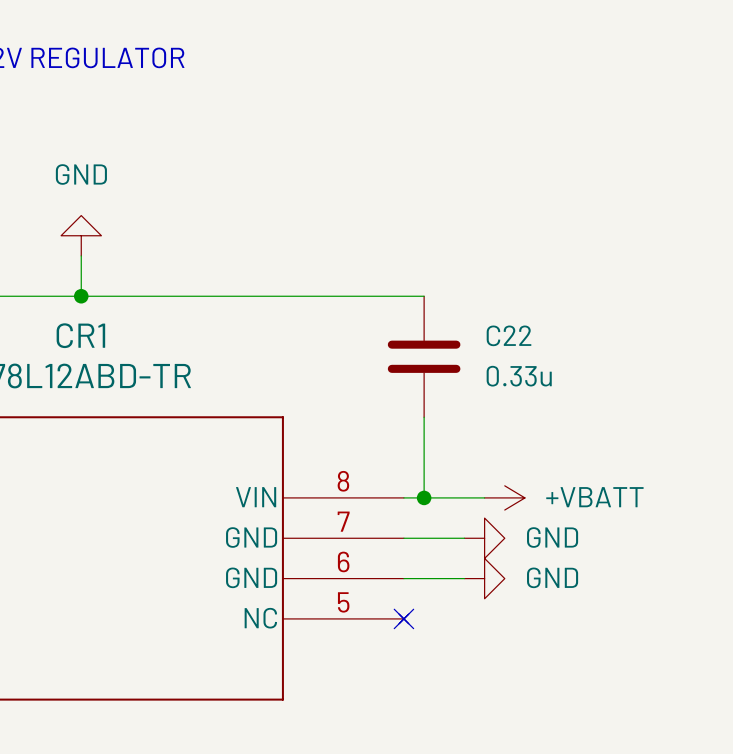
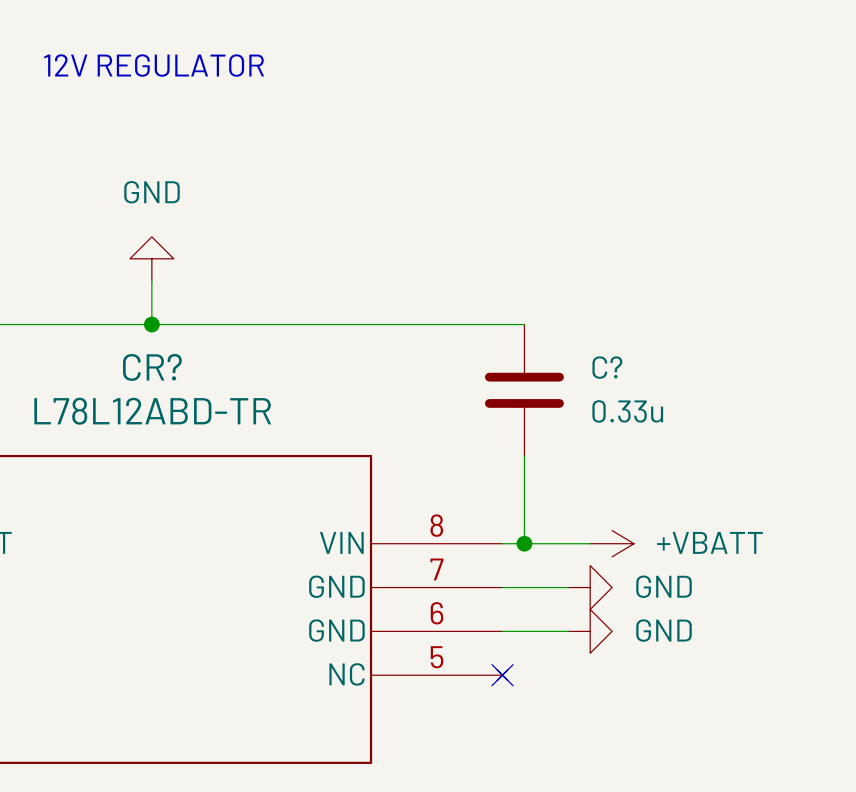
CR1 name: CR1 (80, 335) -> CR? (152, 367)
C22 name: C22 (509, 335) -> C? (607, 367)

